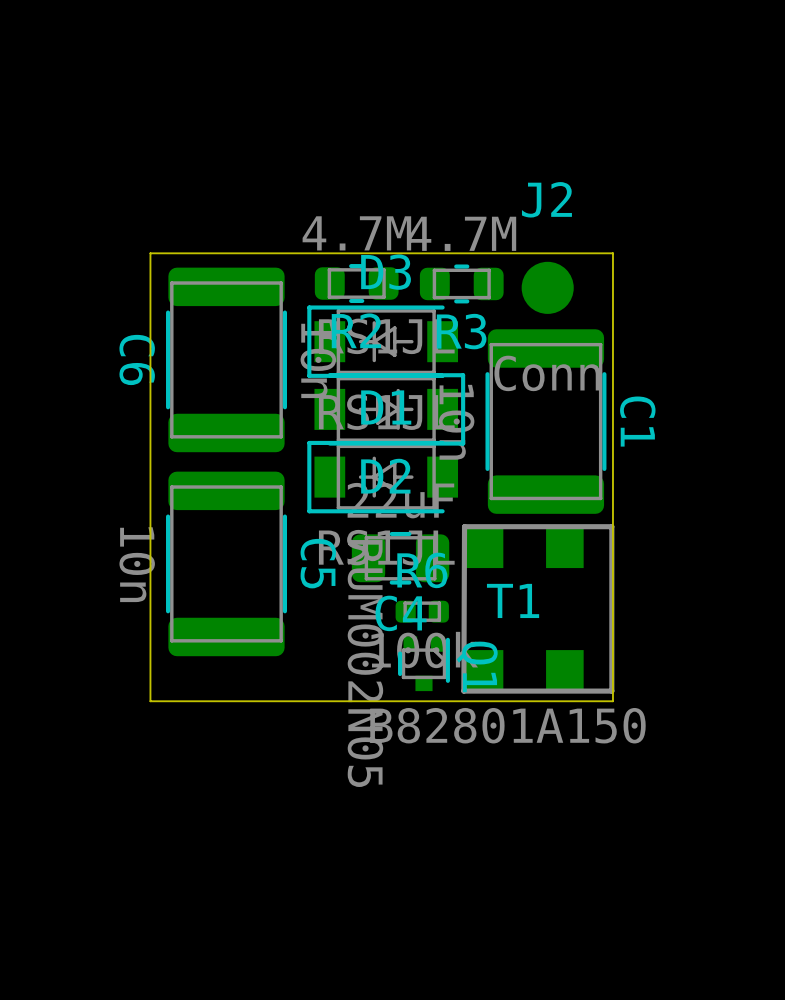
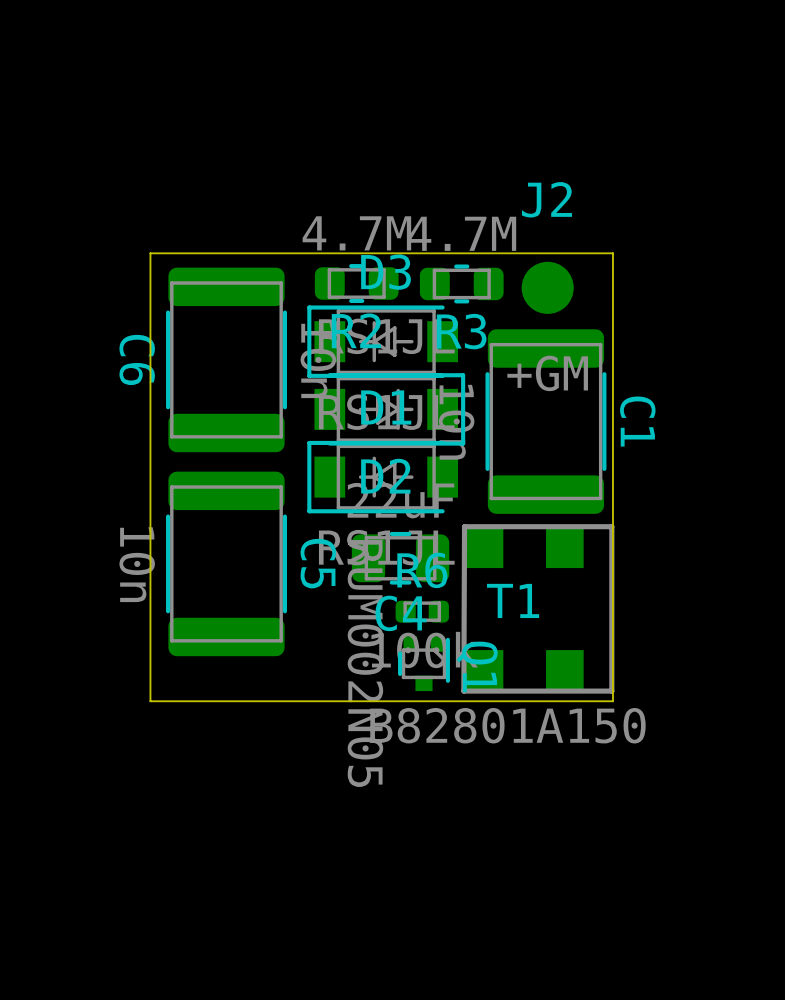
J2 value: Conn (547, 373) -> +GM (547, 373)

